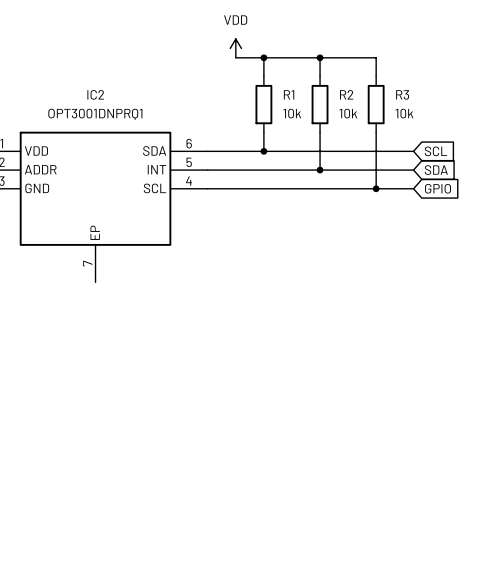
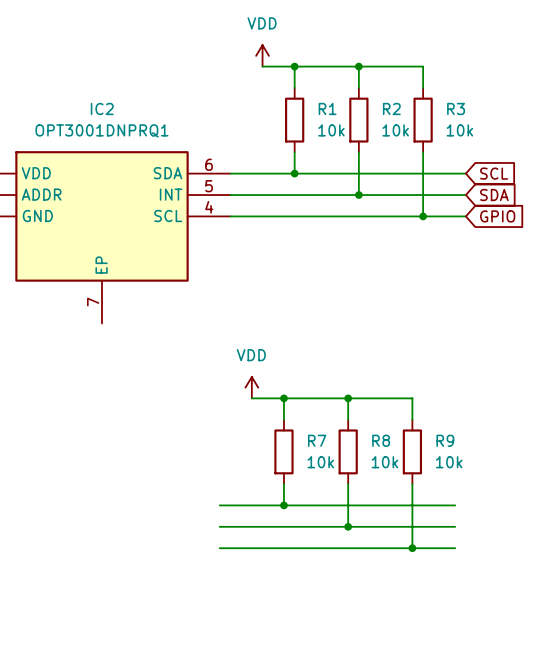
power symbol: none -> VDD (251, 387)
wire: none -> (251, 398) (412, 398) (412, 419)
wire: none -> (283, 398) (283, 419)
junction: none -> (283, 398)
wire: none -> (348, 398) (348, 419)
junction: none -> (348, 398)
R7: none -> 10k (283, 451)
R8: none -> 10k (348, 451)
R9: none -> 10k (412, 451)
wire: none -> (283, 484) (283, 505)
wire: none -> (348, 484) (348, 526)
wire: none -> (412, 484) (412, 548)
wire: none -> (219, 505) (455, 505)
junction: none -> (283, 505)
wire: none -> (219, 526) (455, 526)
junction: none -> (348, 526)
wire: none -> (219, 548) (455, 548)
junction: none -> (412, 548)

